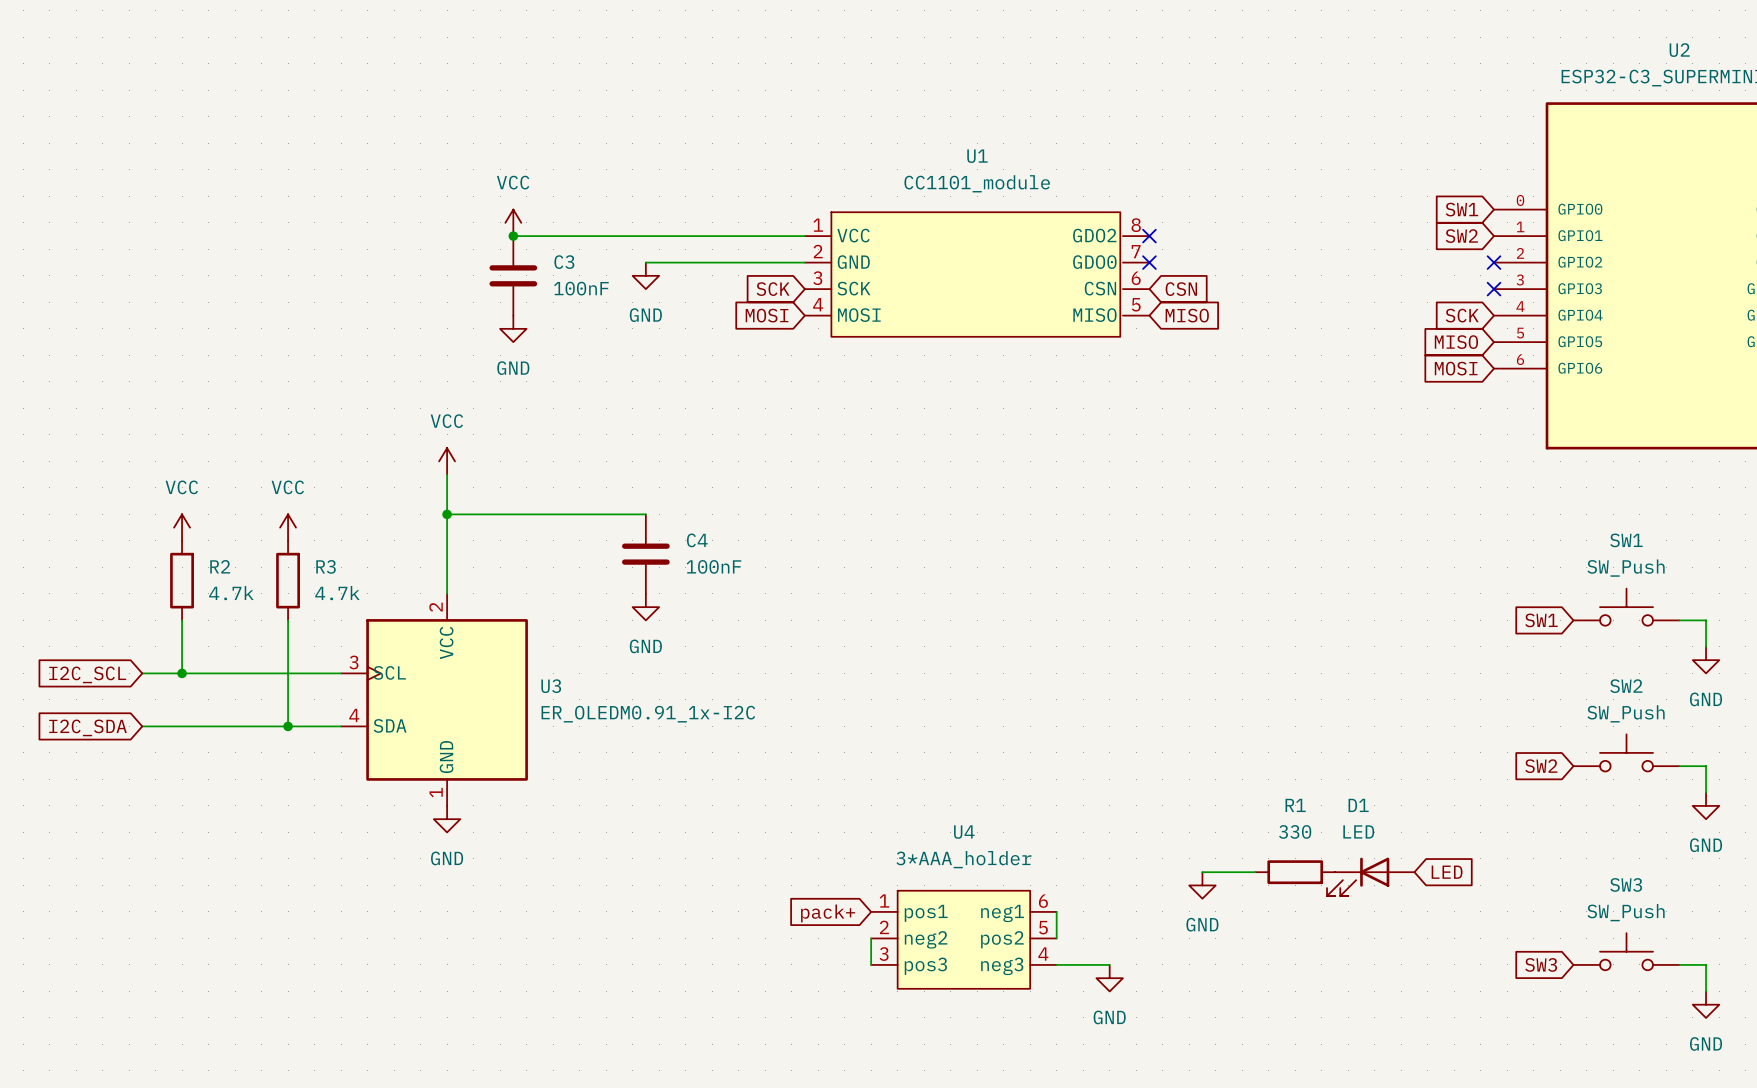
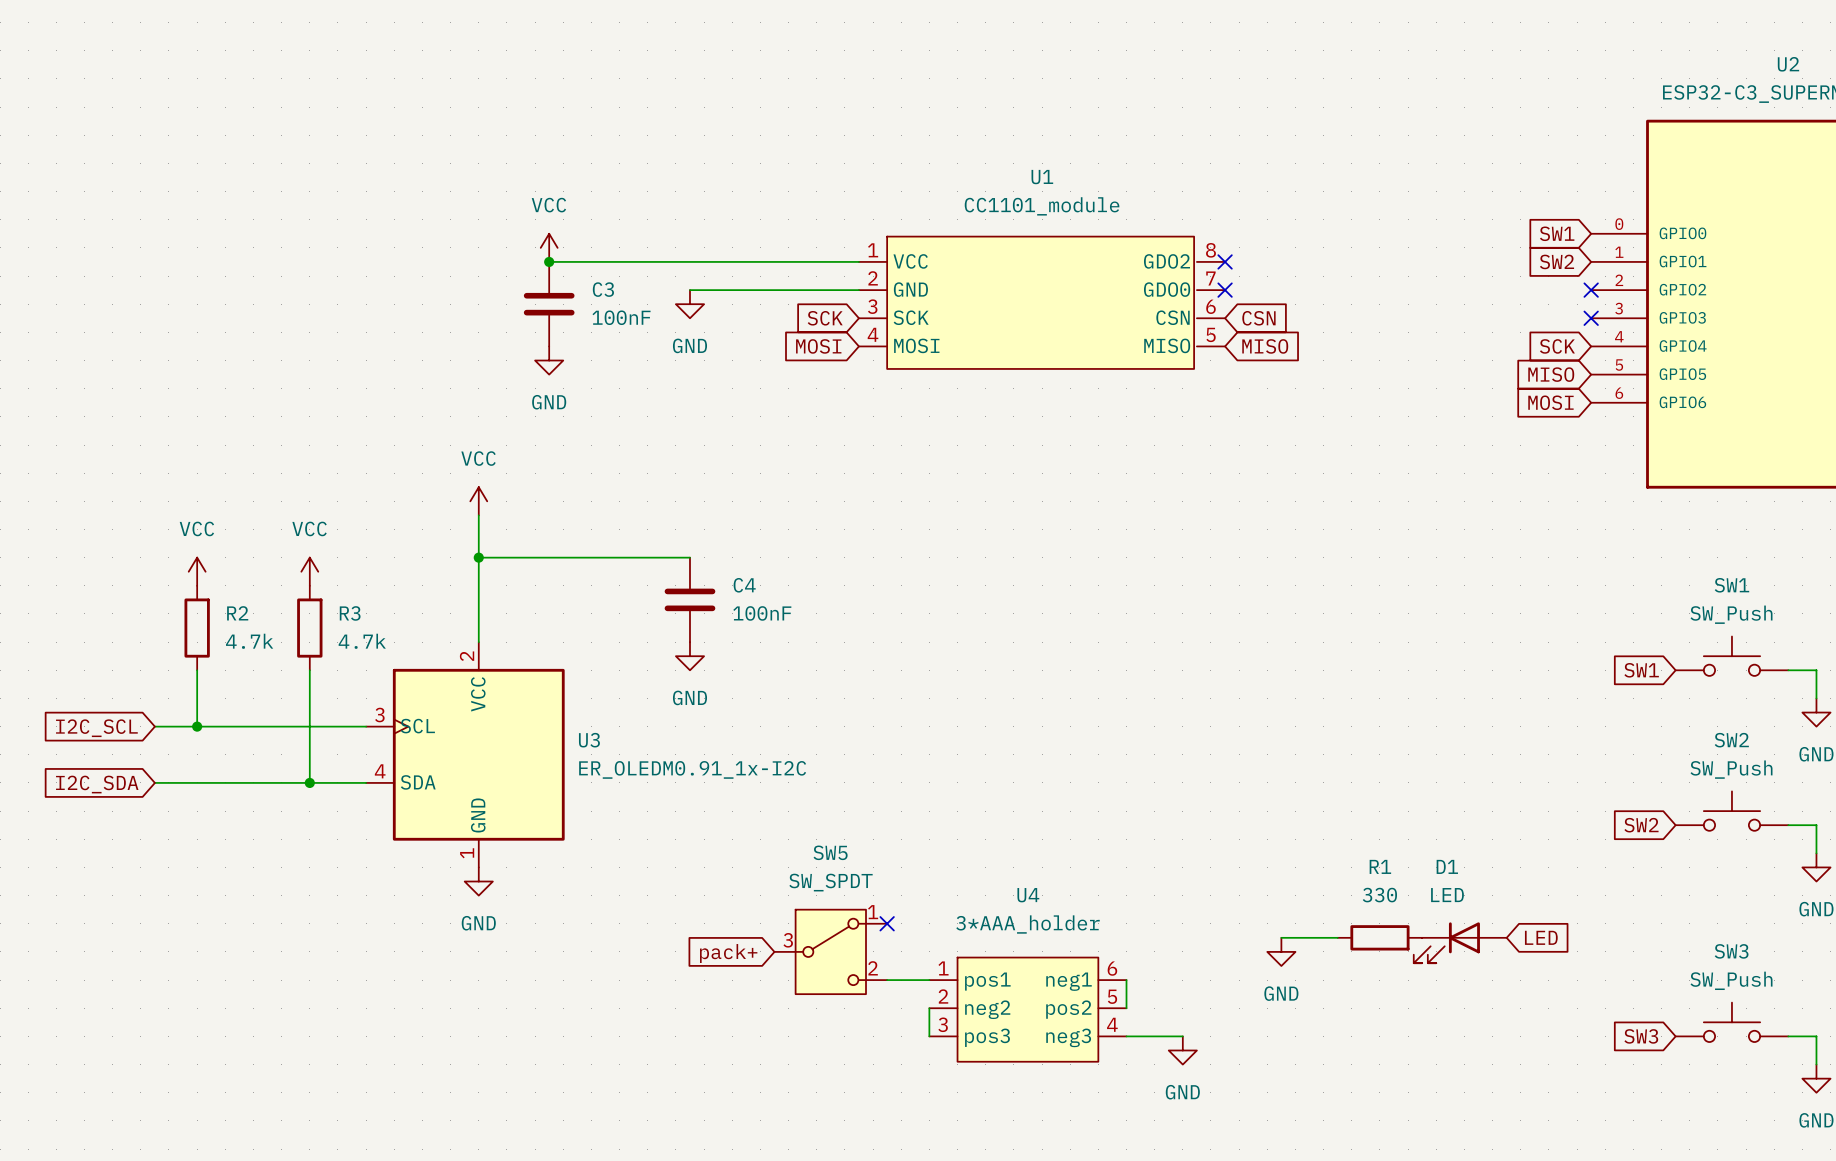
no-connect mark: none -> (887, 923)
SW5: none -> SW_SPDT (830, 951)
wire: none -> (887, 980) (929, 980)
global label position: pack+ (828, 913) -> pack+ (728, 953)

